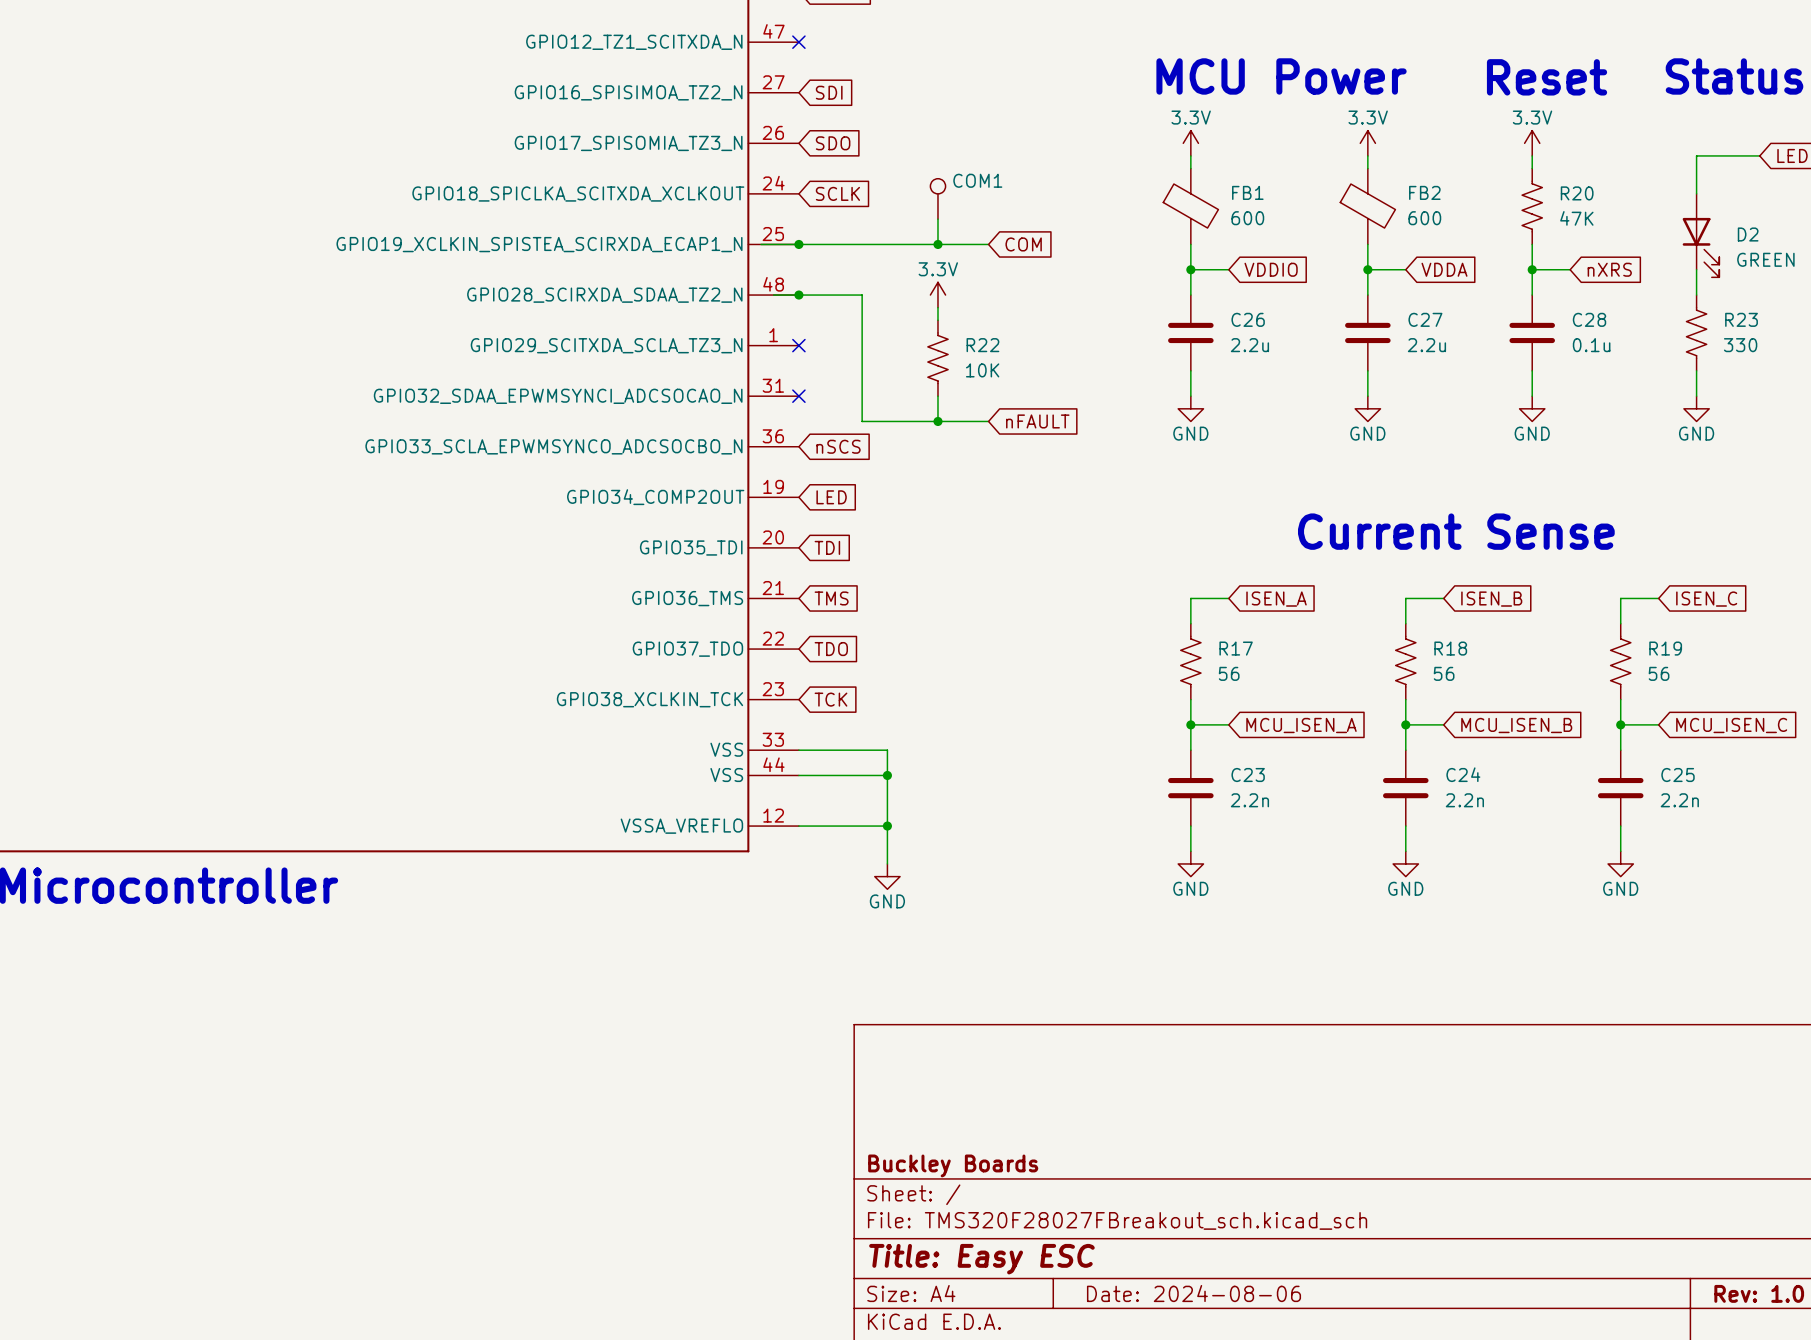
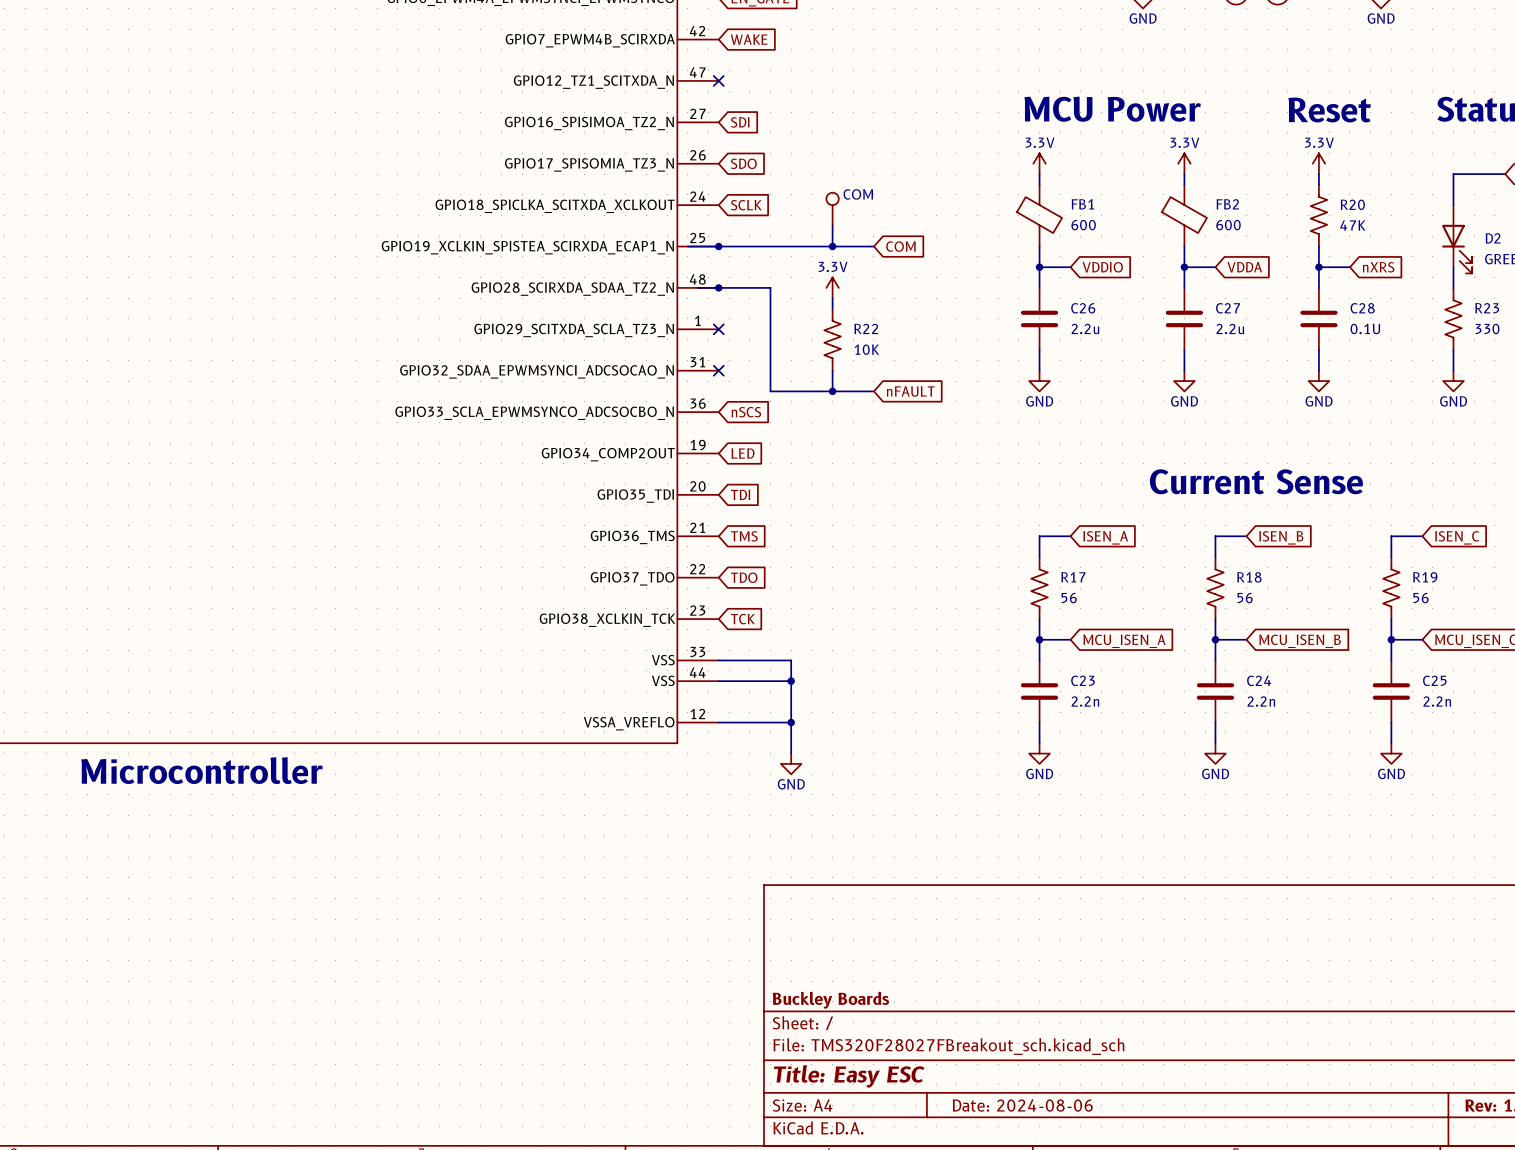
COM1 name: COM1 (977, 180) -> COM (858, 194)
C28 value: 0.1u (1591, 345) -> 0.1U (1365, 328)

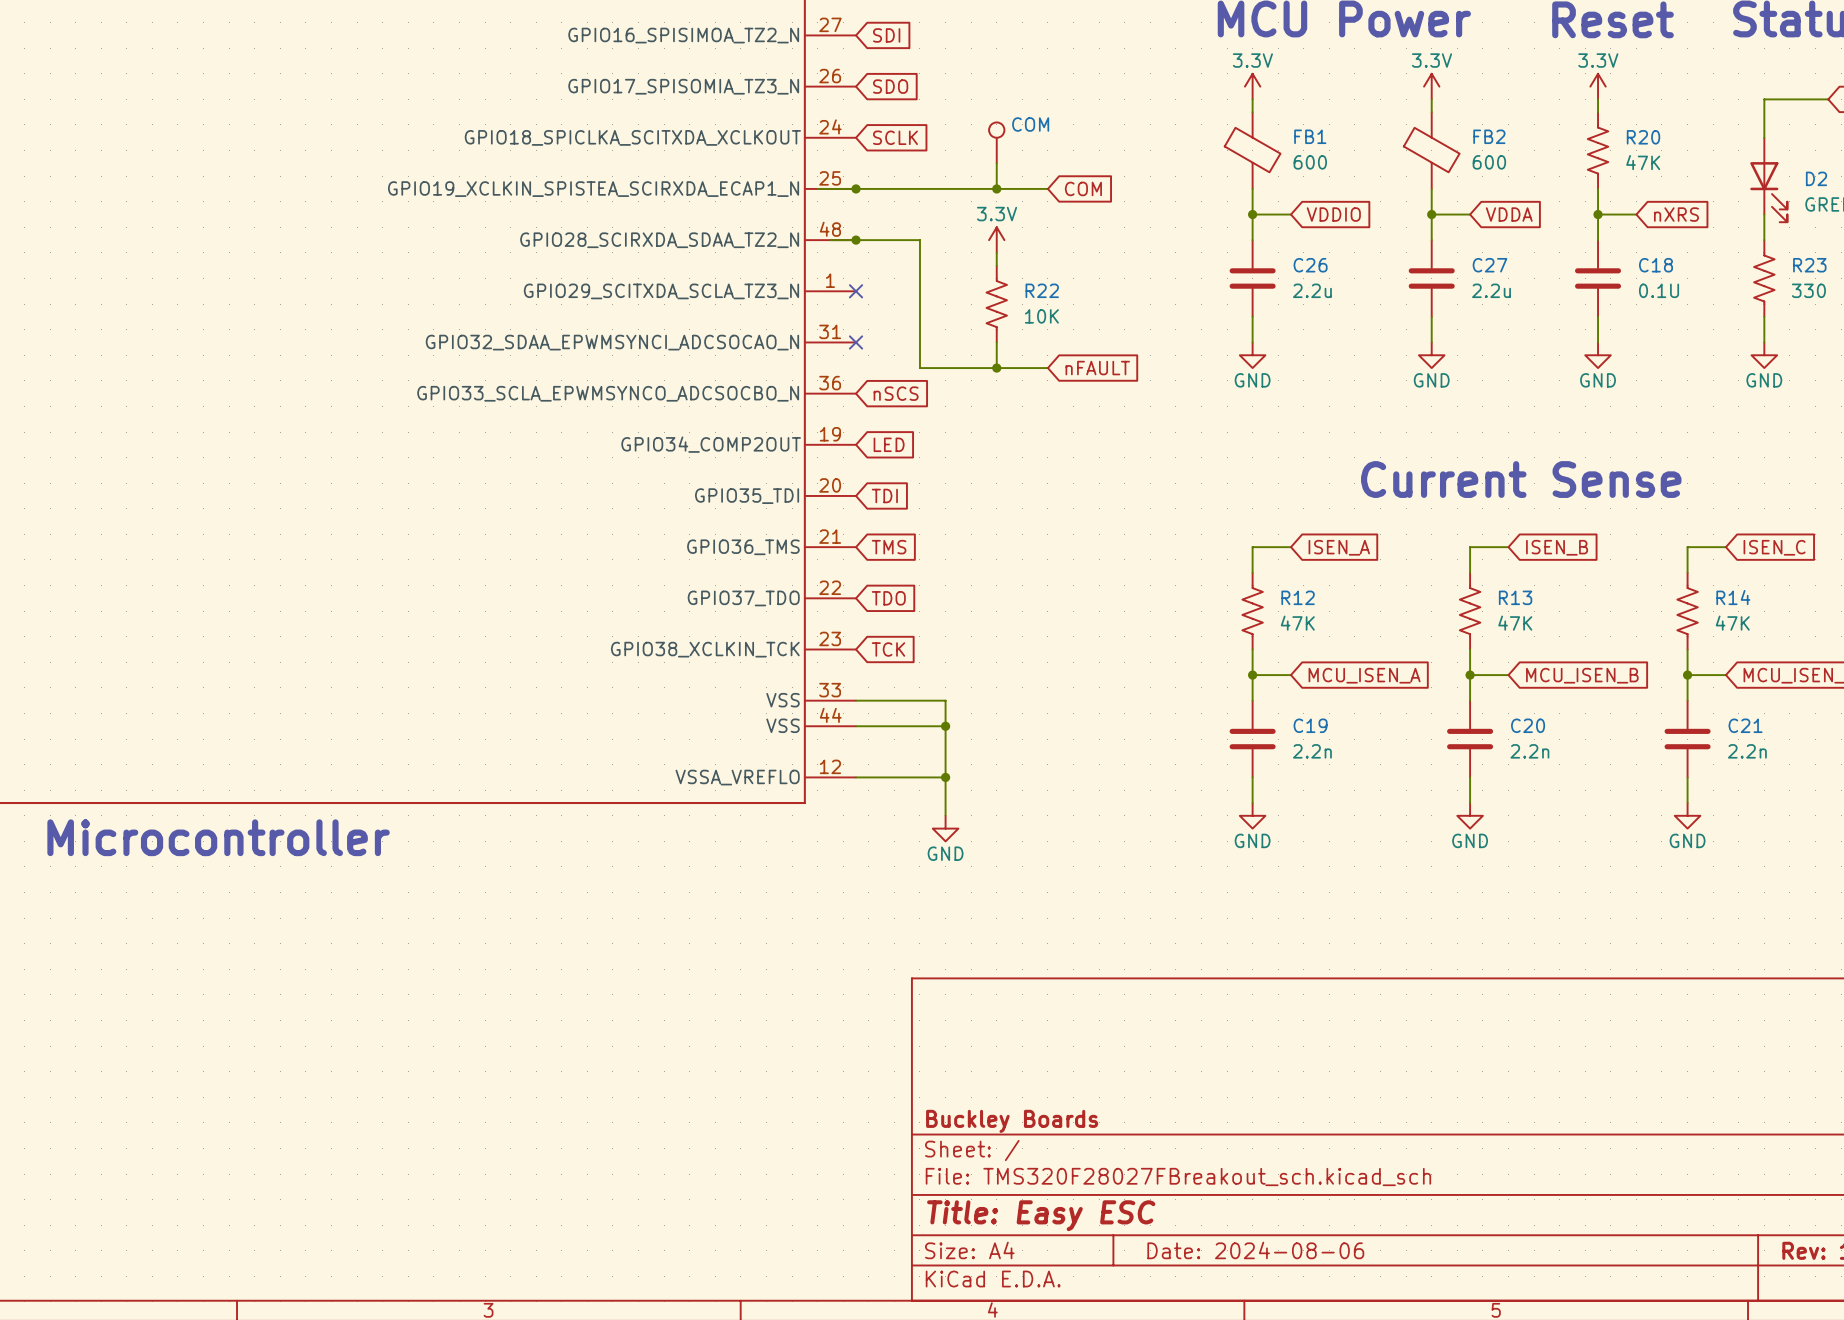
C28 name: C28 (1362, 308) -> C18 (1655, 265)
R17 name: R17 (1073, 577) -> R12 (1298, 597)
R18 name: R18 (1249, 577) -> R13 (1515, 597)
R19 name: R19 (1425, 577) -> R14 (1733, 597)
R17 value: 56 (1069, 598) -> 47K (1297, 623)
R18 value: 56 (1245, 598) -> 47K (1515, 623)
R19 value: 56 (1421, 598) -> 47K (1732, 623)
C23 name: C23 (1083, 680) -> C19 (1310, 725)
C24 name: C24 (1259, 680) -> C20 (1528, 725)
C25 name: C25 (1434, 680) -> C21 (1745, 725)

